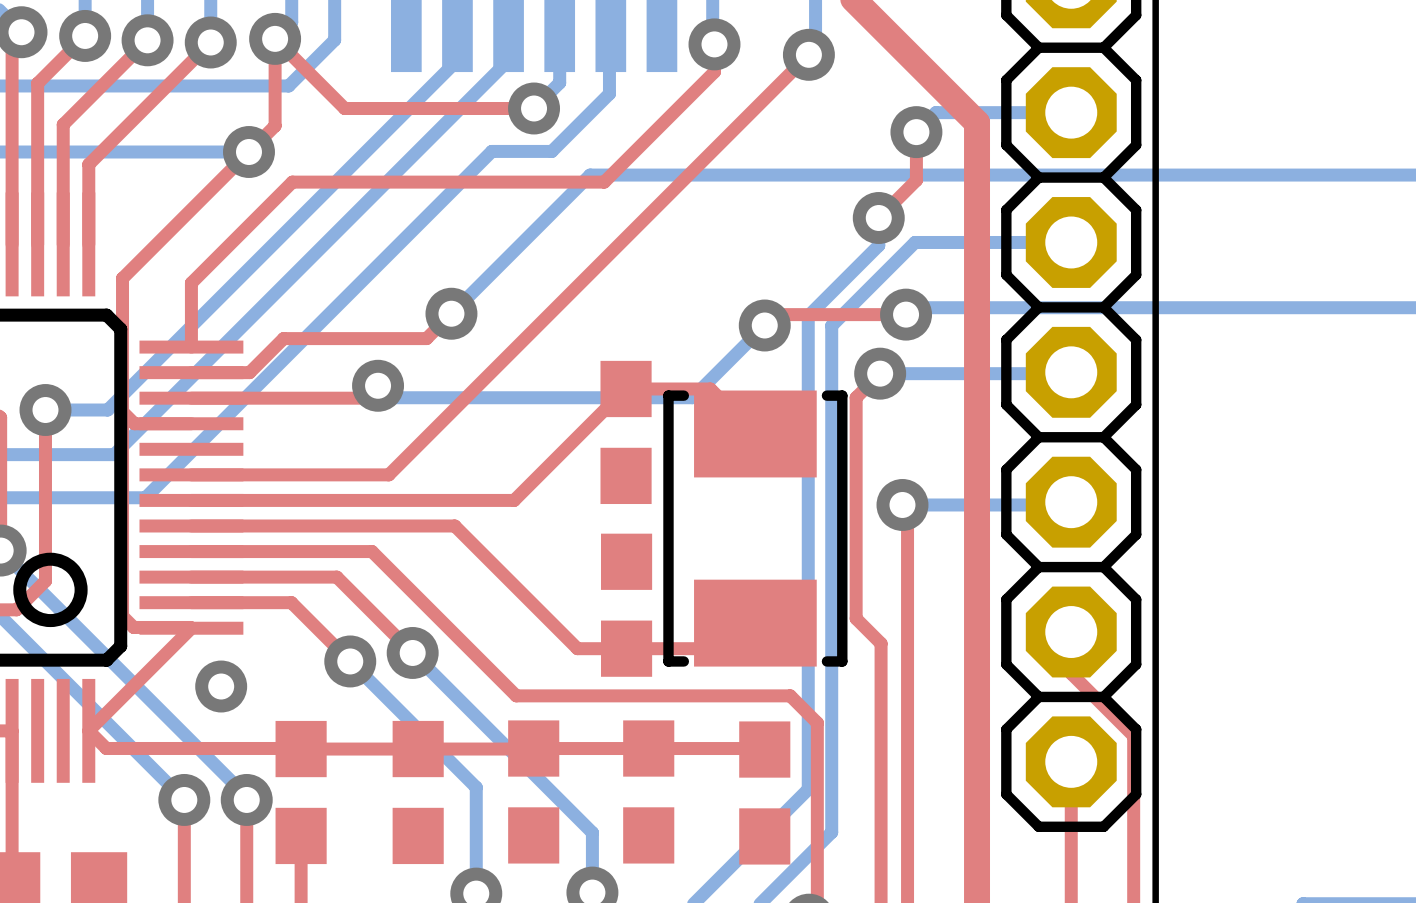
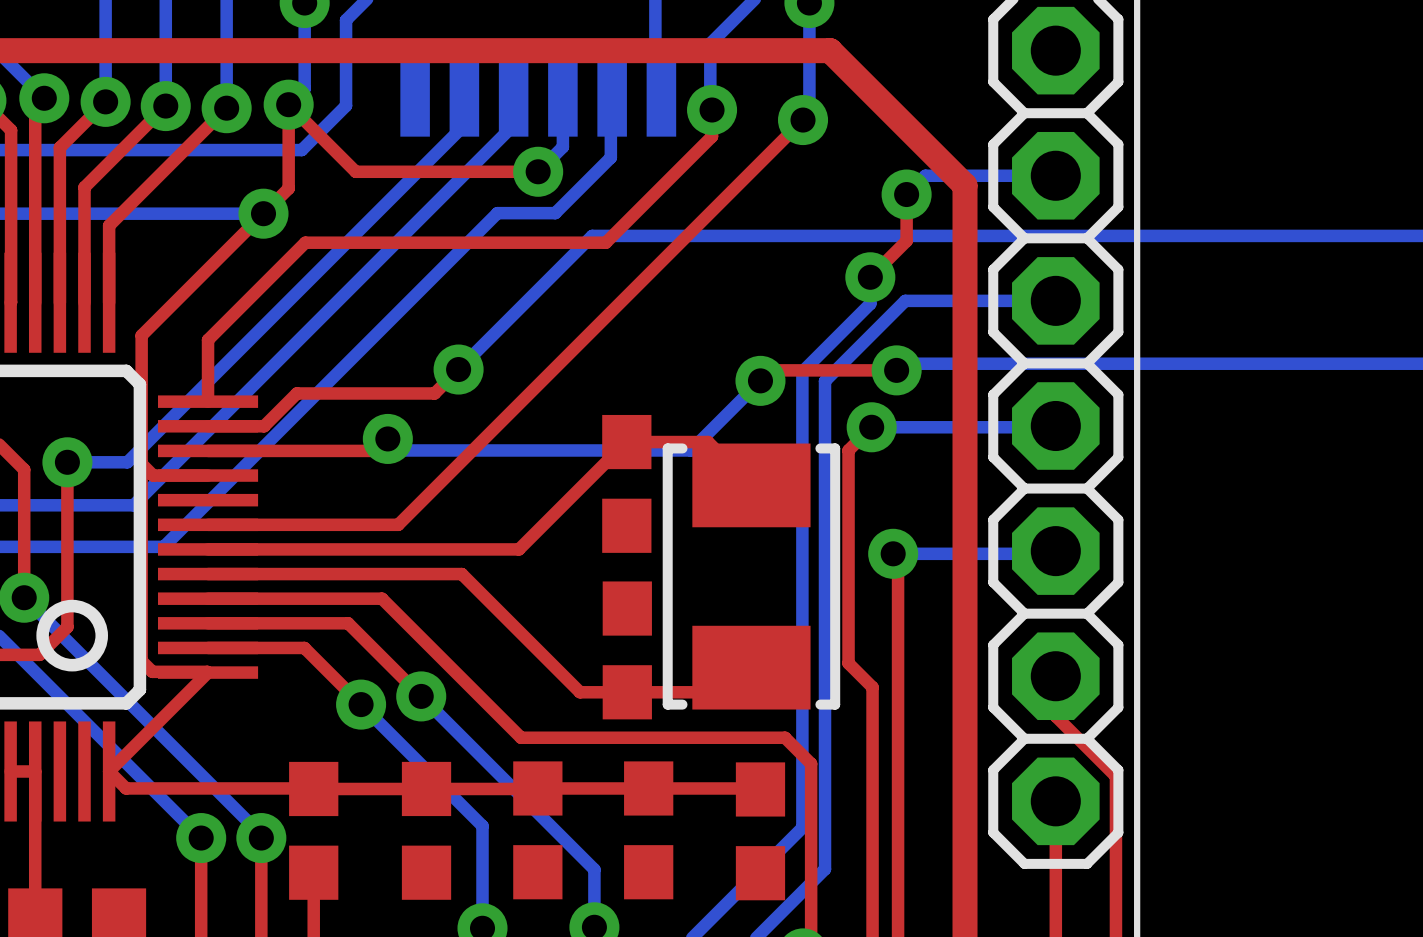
via: (221, 686) -> none

